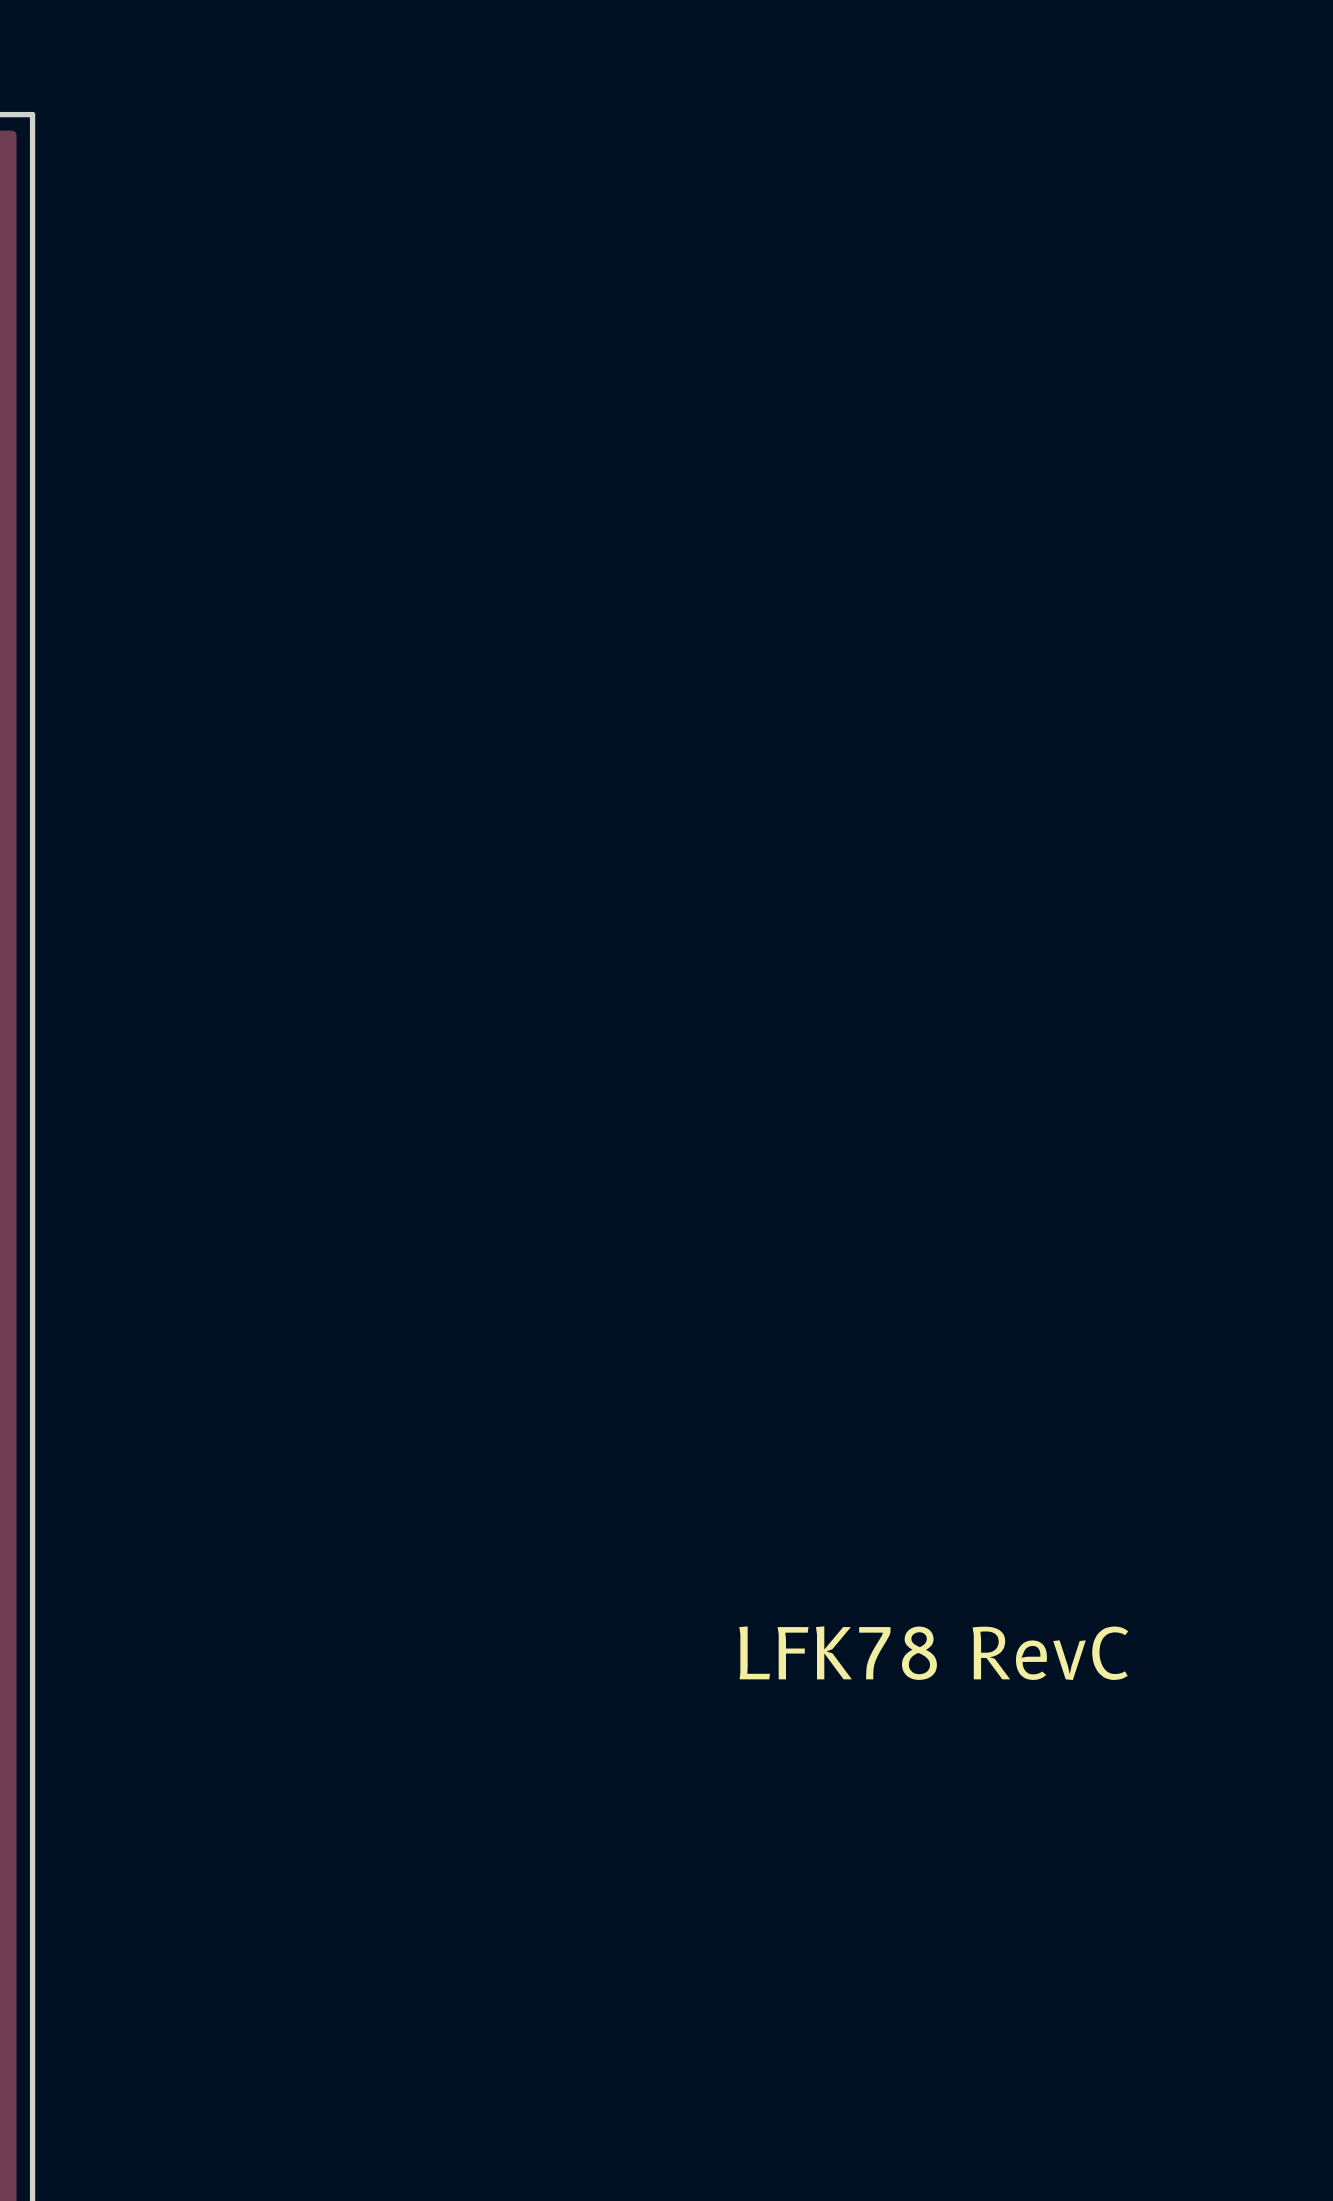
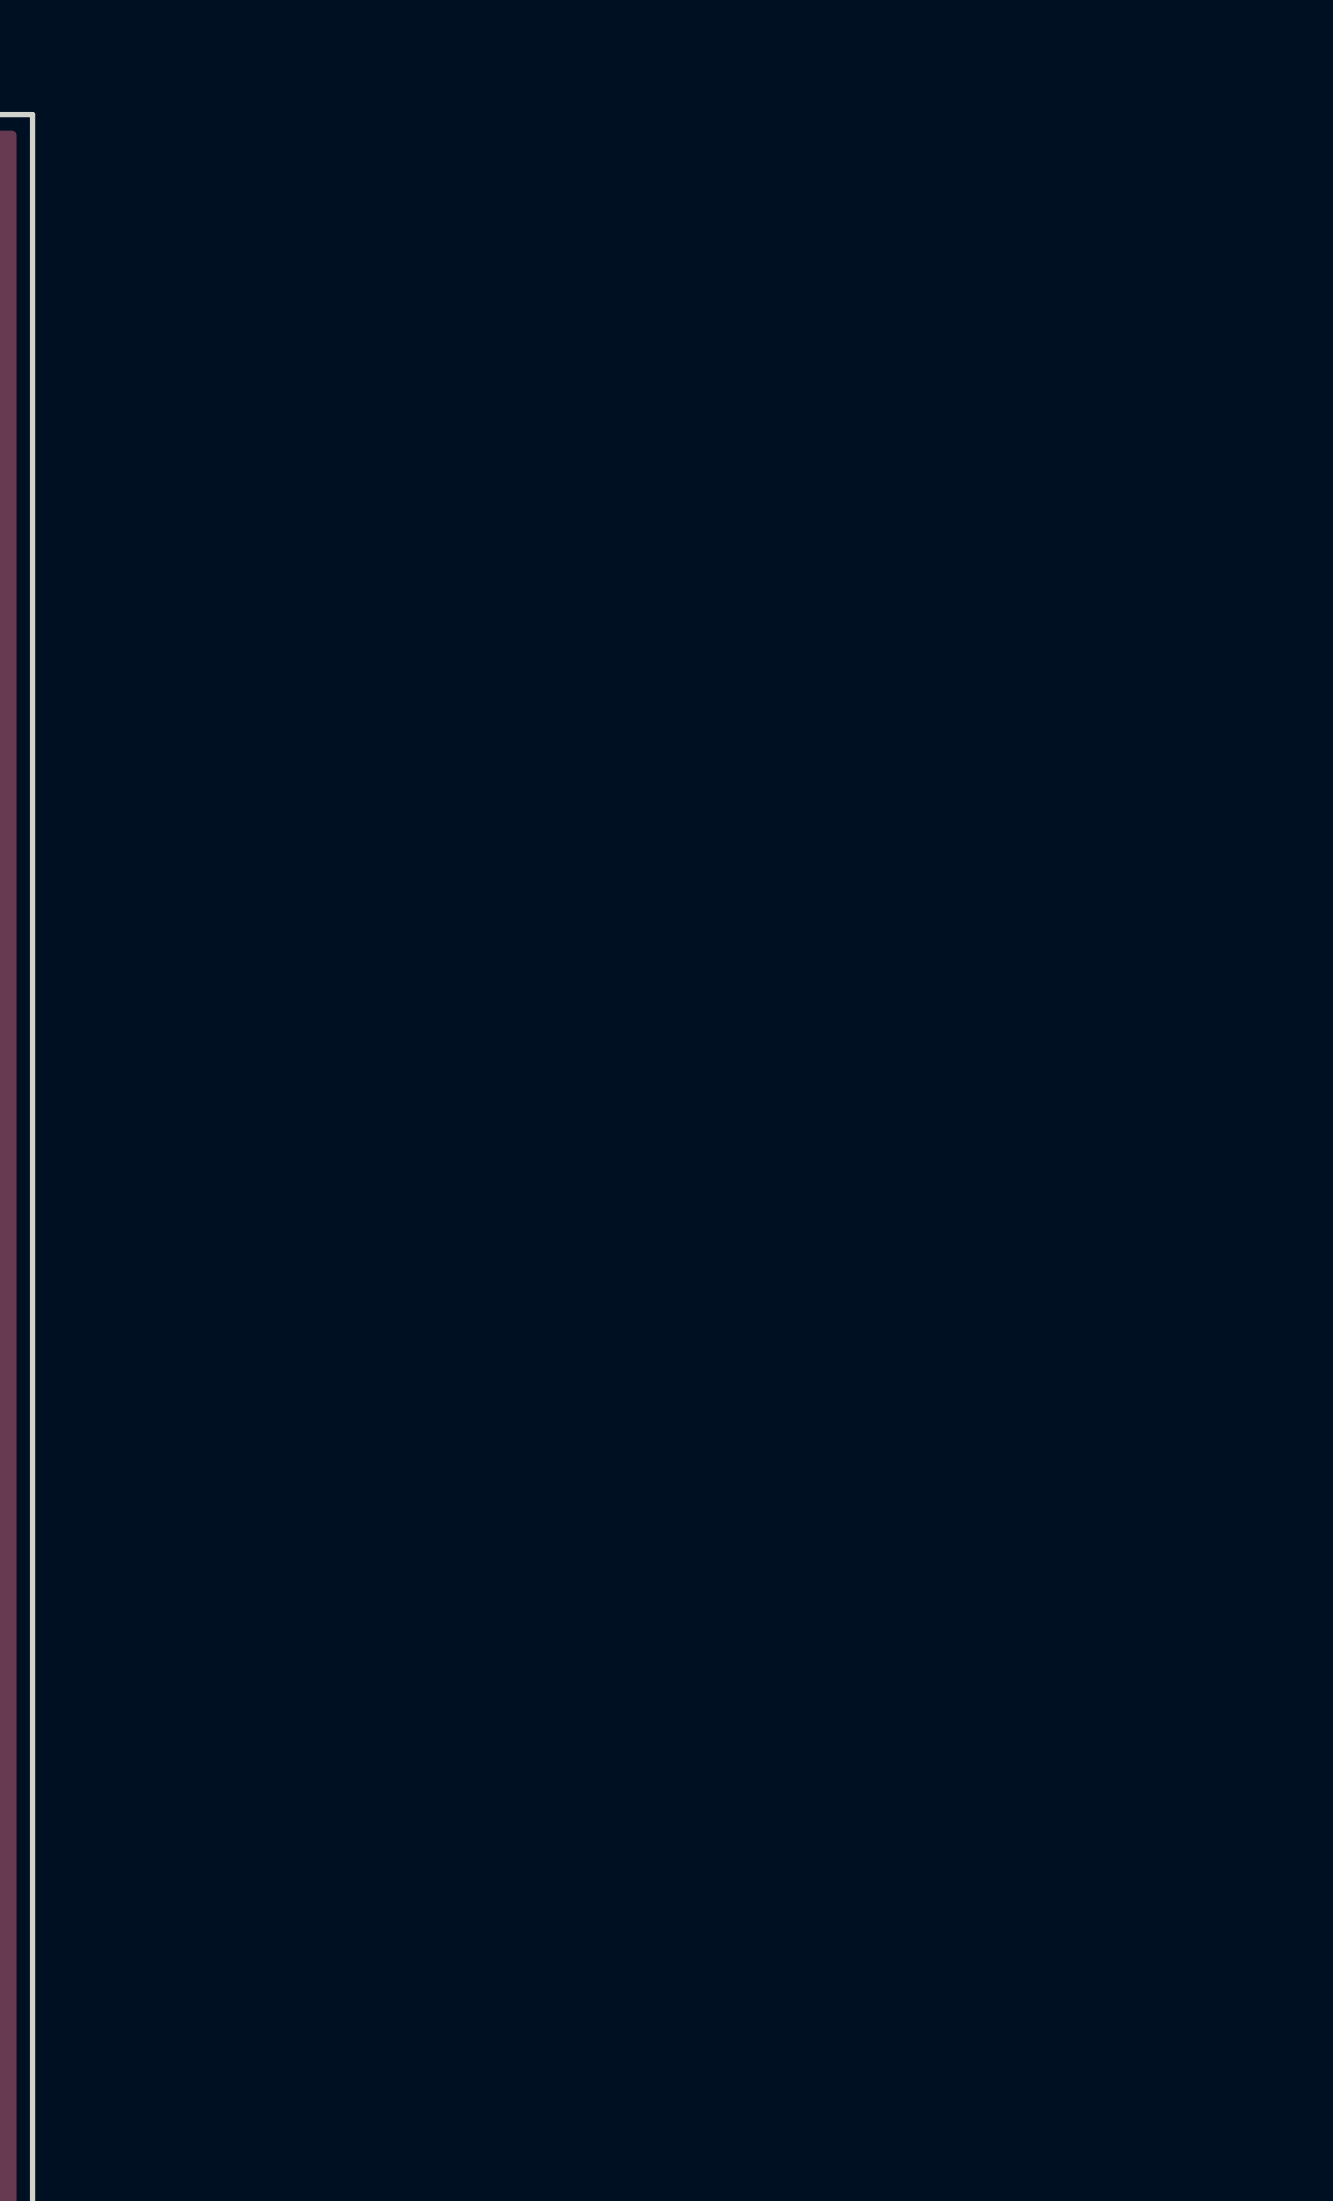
text: LFK78 RevC (933, 1653) -> none

